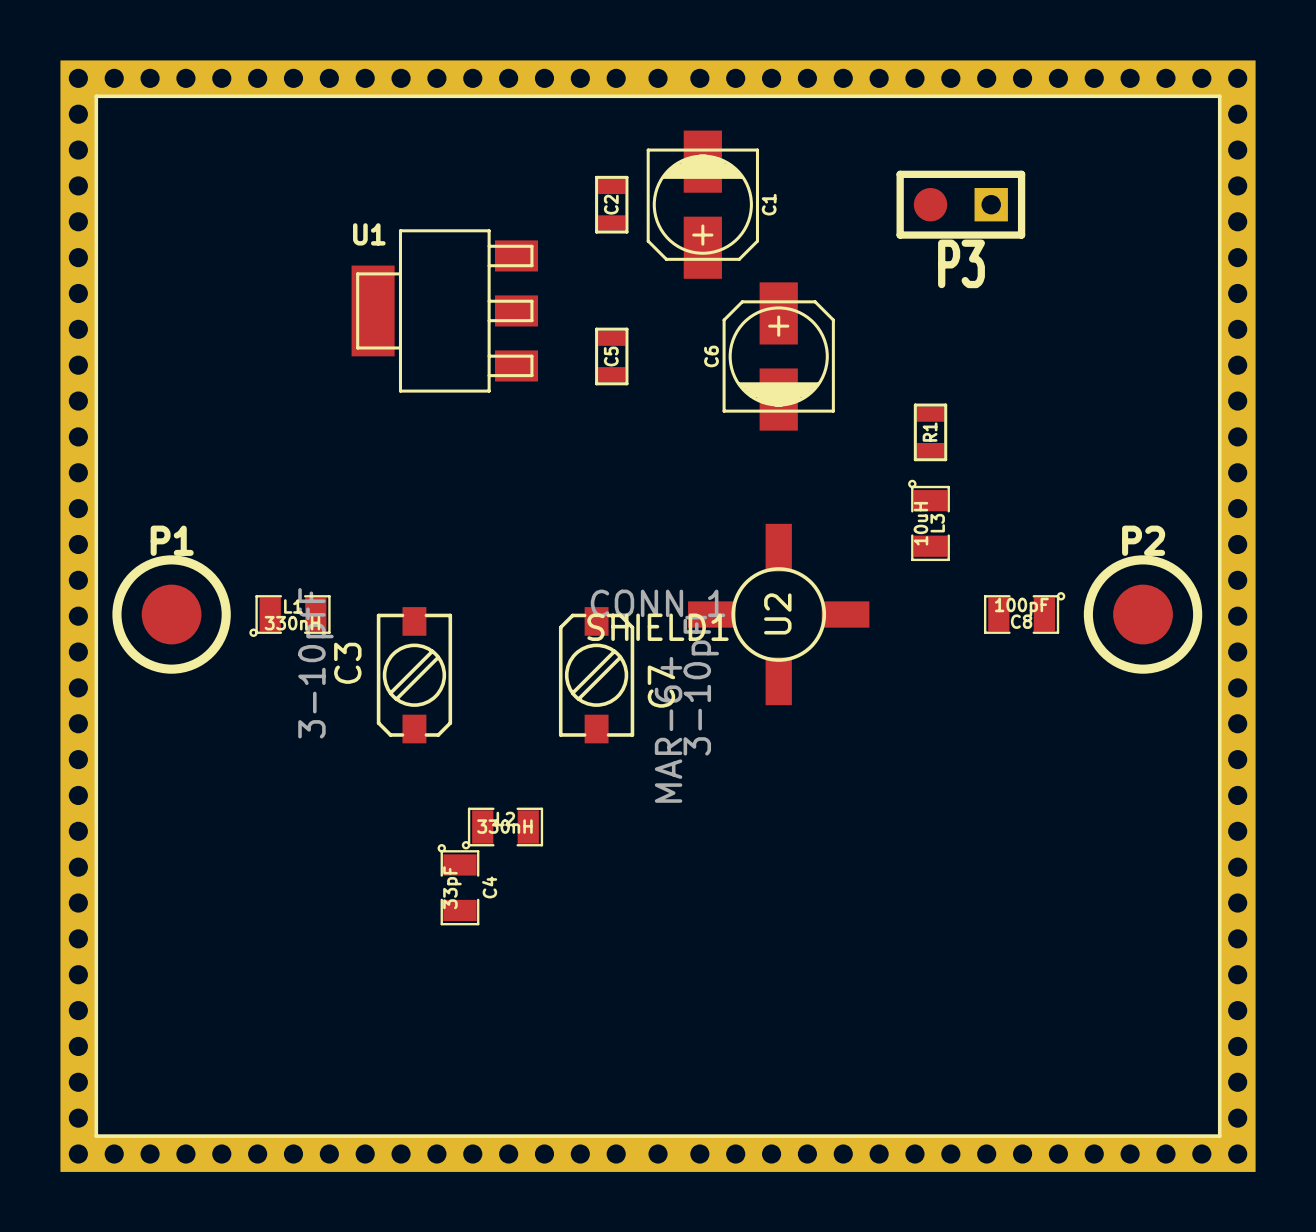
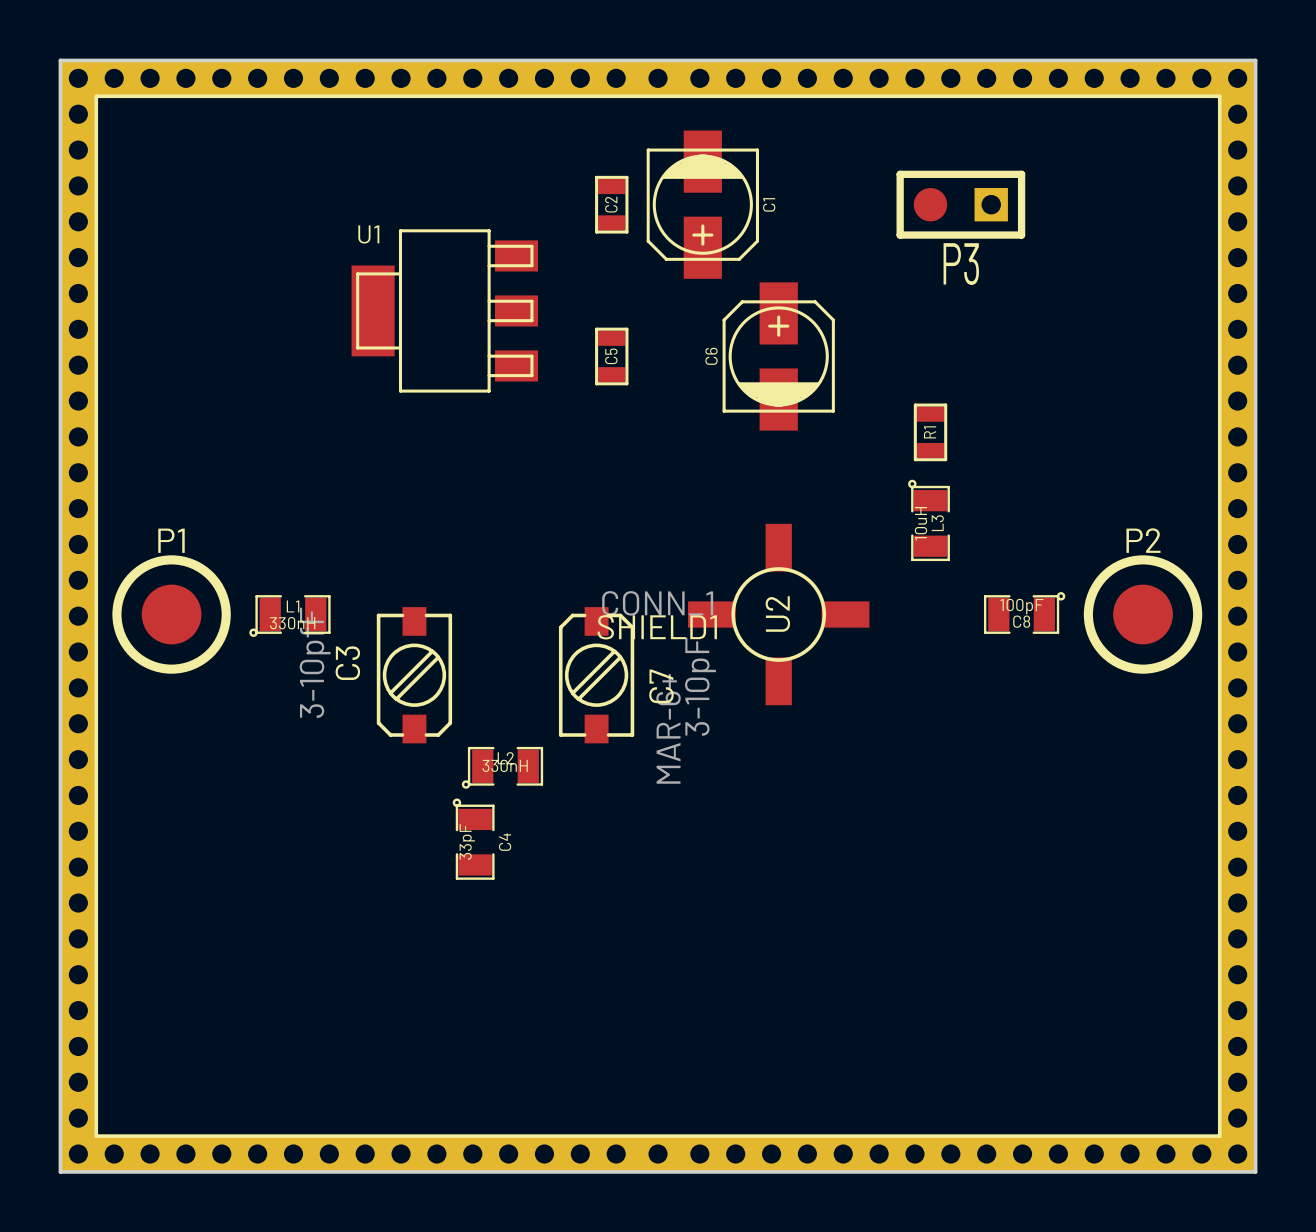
board edge: none -> (60, 60) (60, 1171) (1255, 1171) (1255, 60) (60, 60)
L2 position: (502, 828) -> (502, 767)
C4 position: (458, 884) -> (473, 839)

